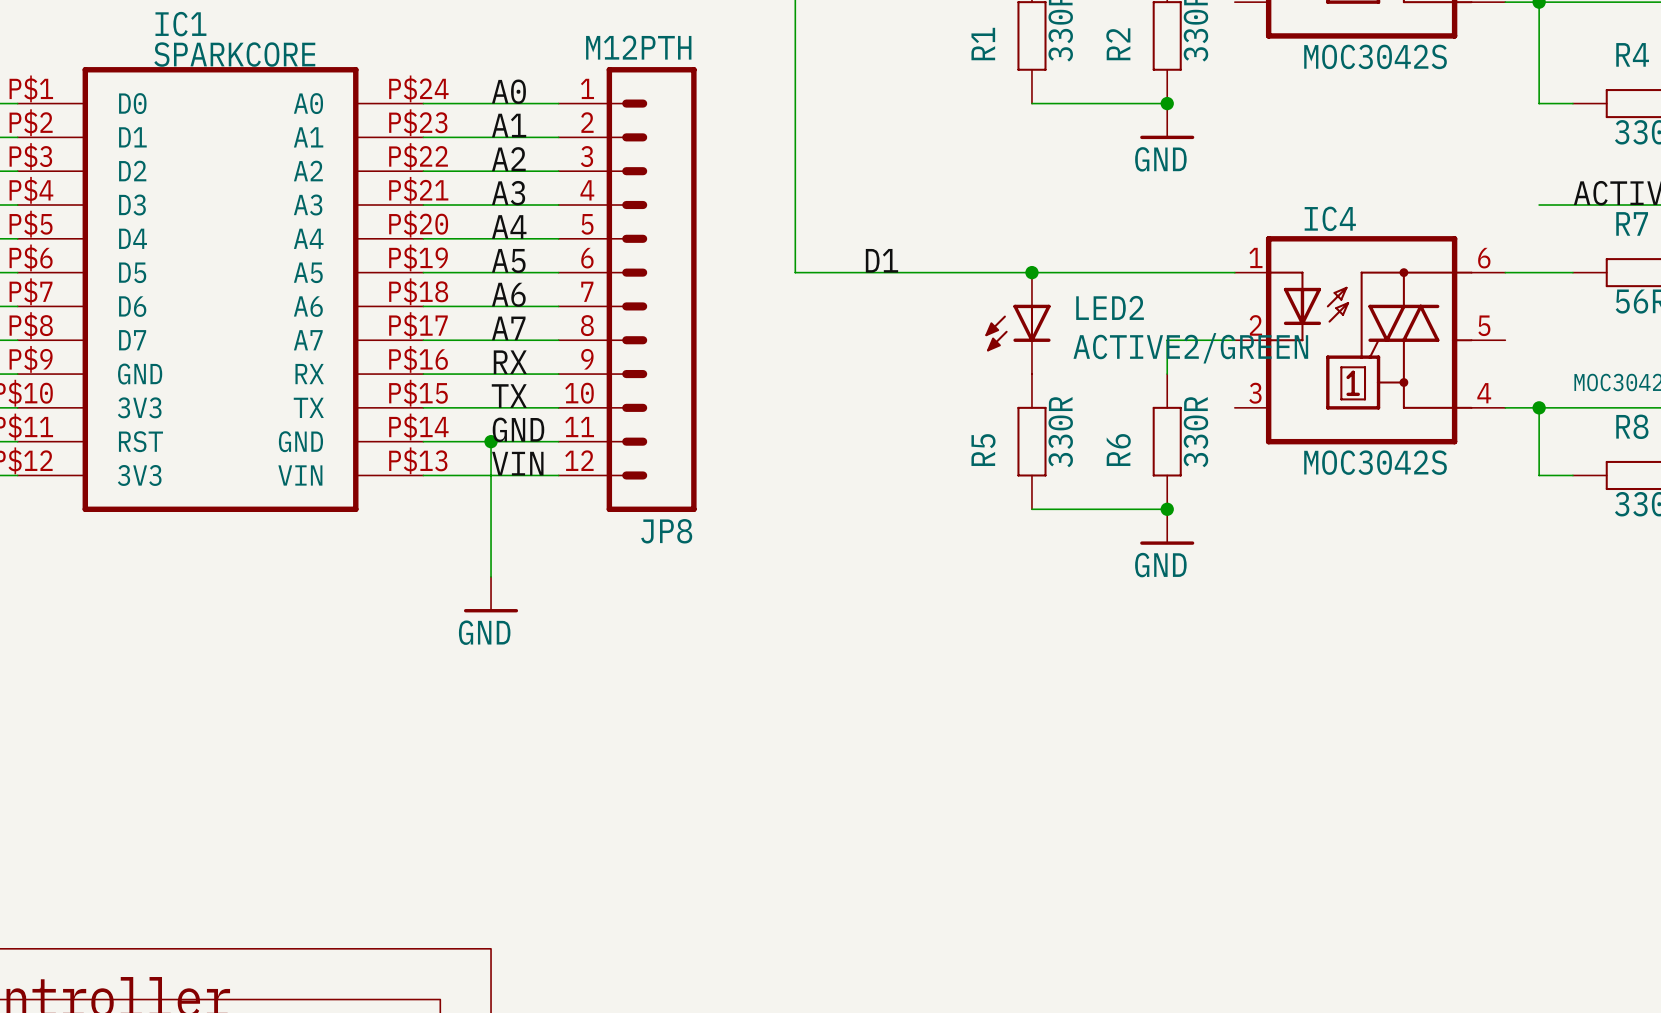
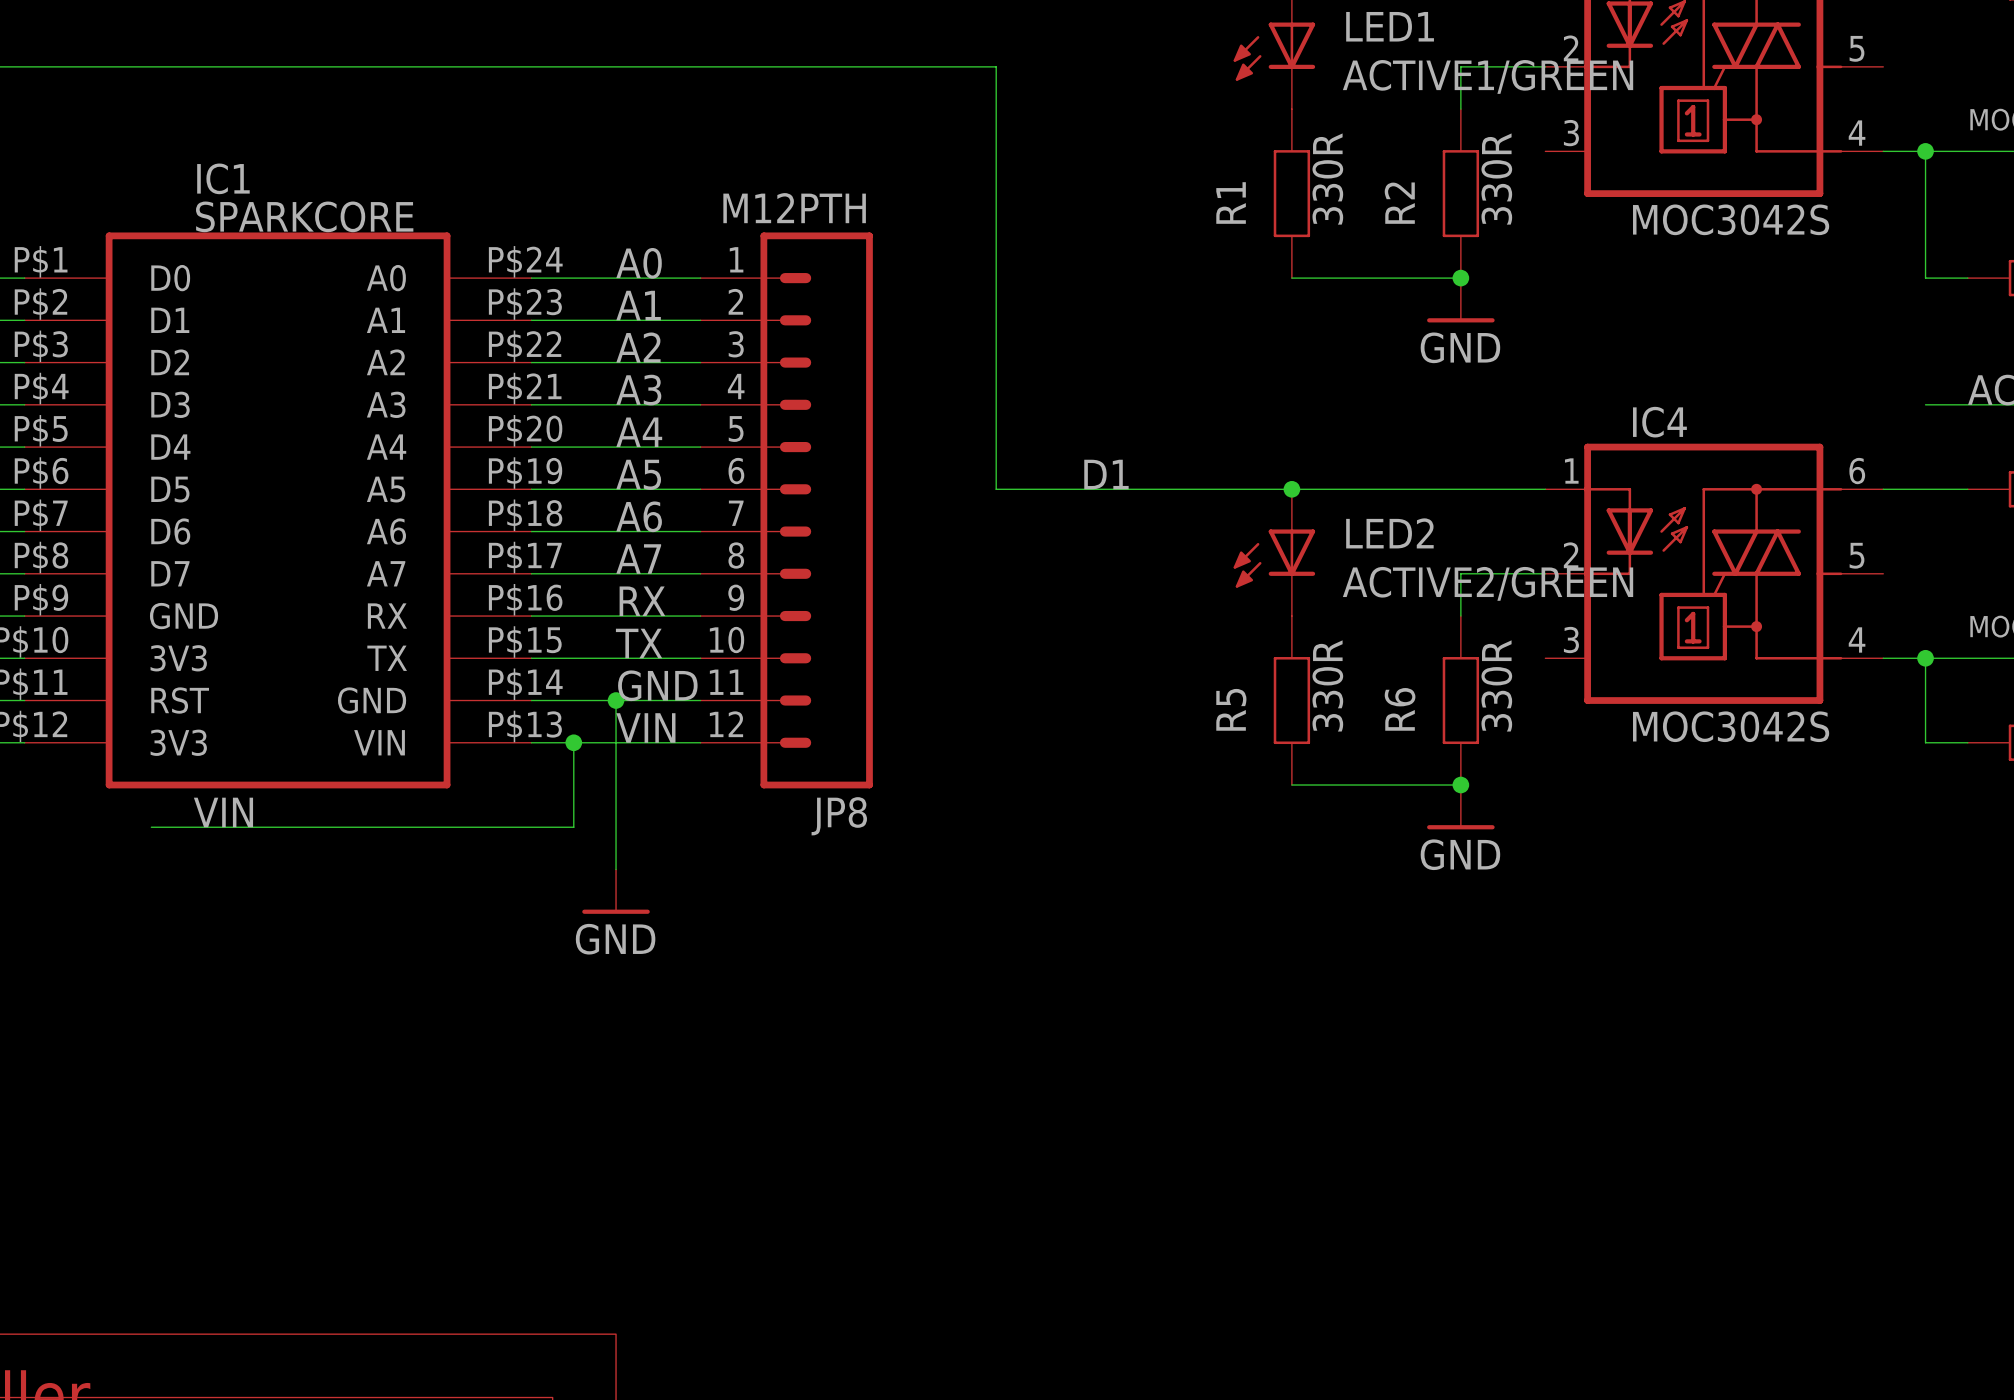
wire: none -> (573, 742) (573, 827) (151, 827)
junction: none -> (573, 742)
label: none -> VIN (223, 812)

